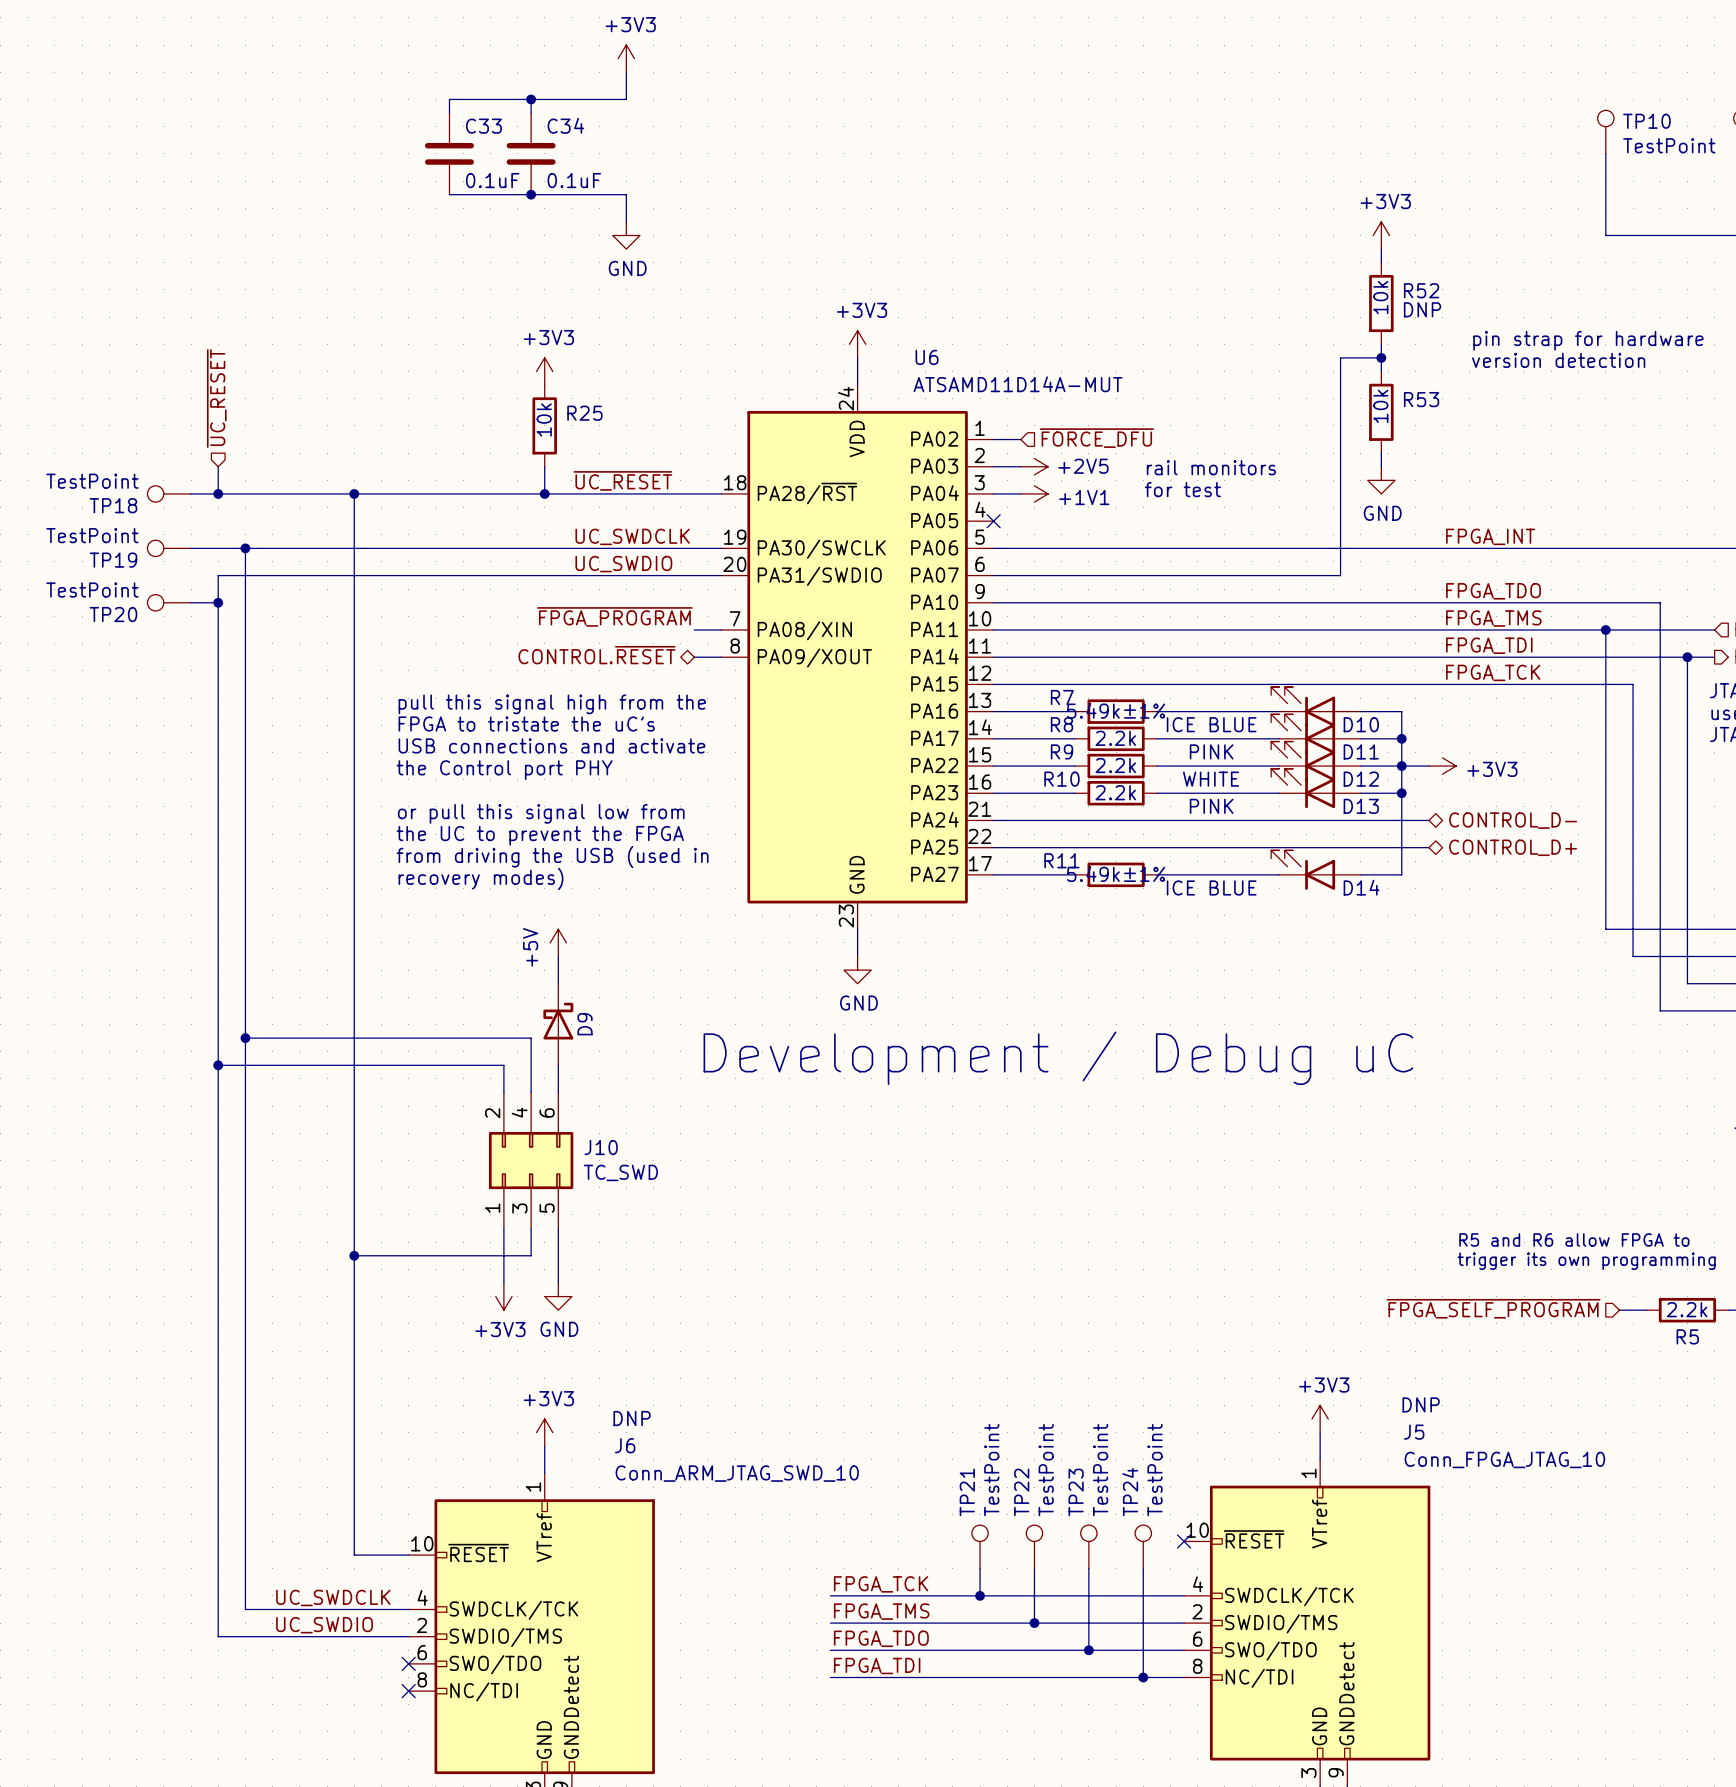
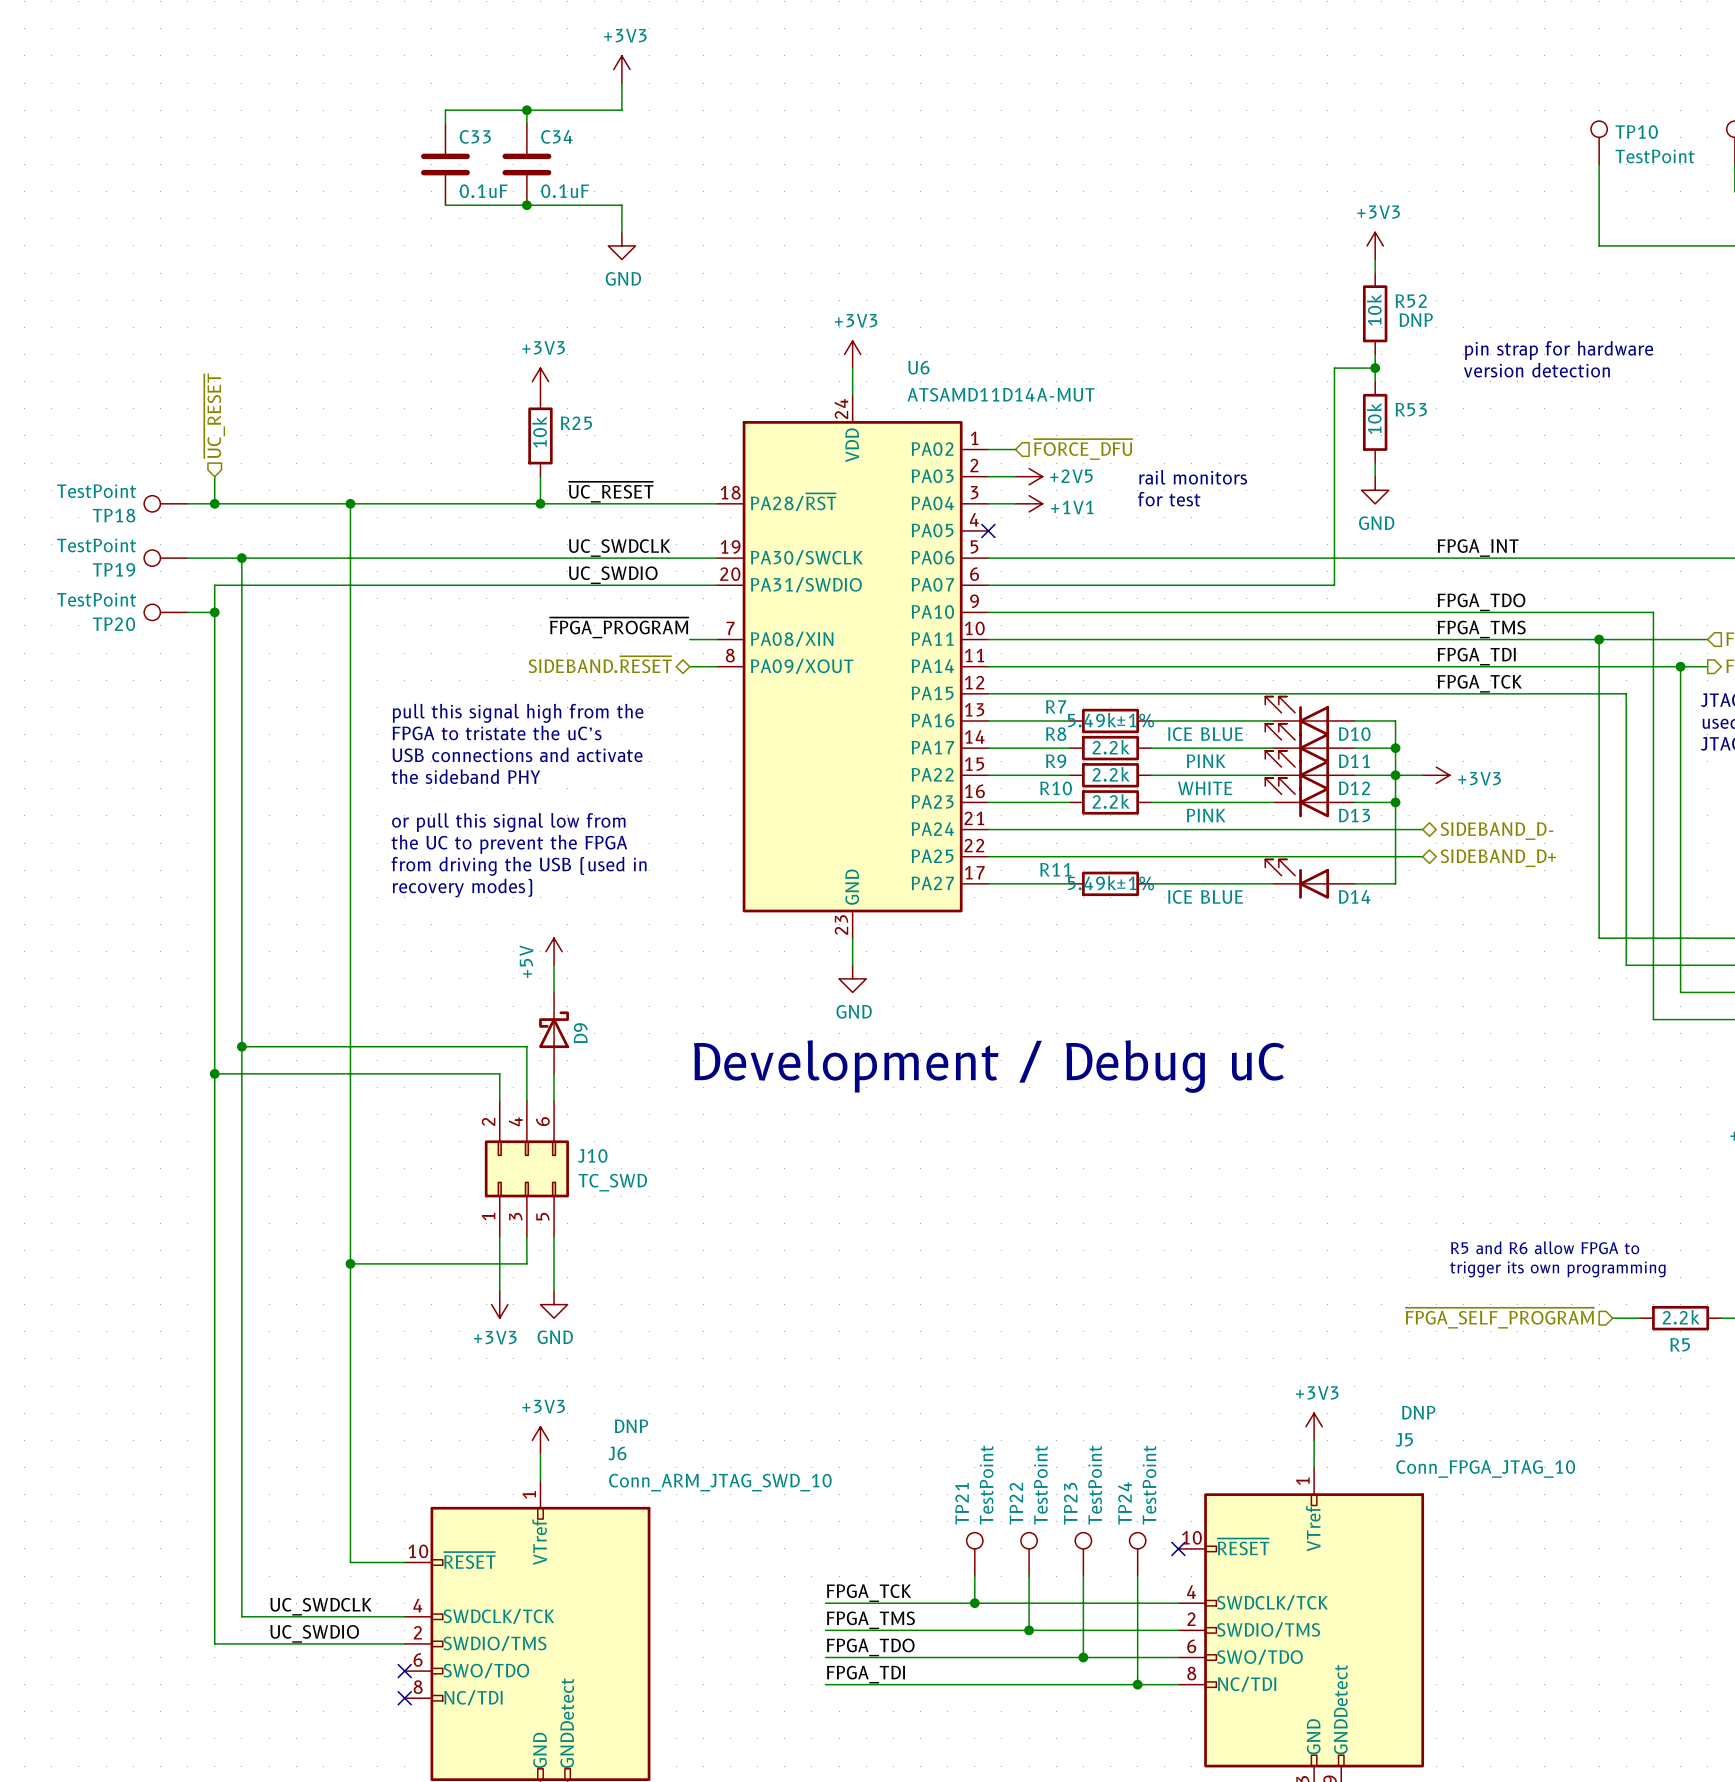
hierarchical label: CONTROL.~{RESET} (596, 655) -> SIDEBAND.~{RESET} (600, 664)
text: the Control port PHY (504, 770) -> the sideband PHY (465, 776)
hierarchical label: CONTROL_D- (1513, 820) -> SIDEBAND_D- (1497, 831)
hierarchical label: CONTROL_D+ (1513, 847) -> SIDEBAND_D+ (1498, 858)

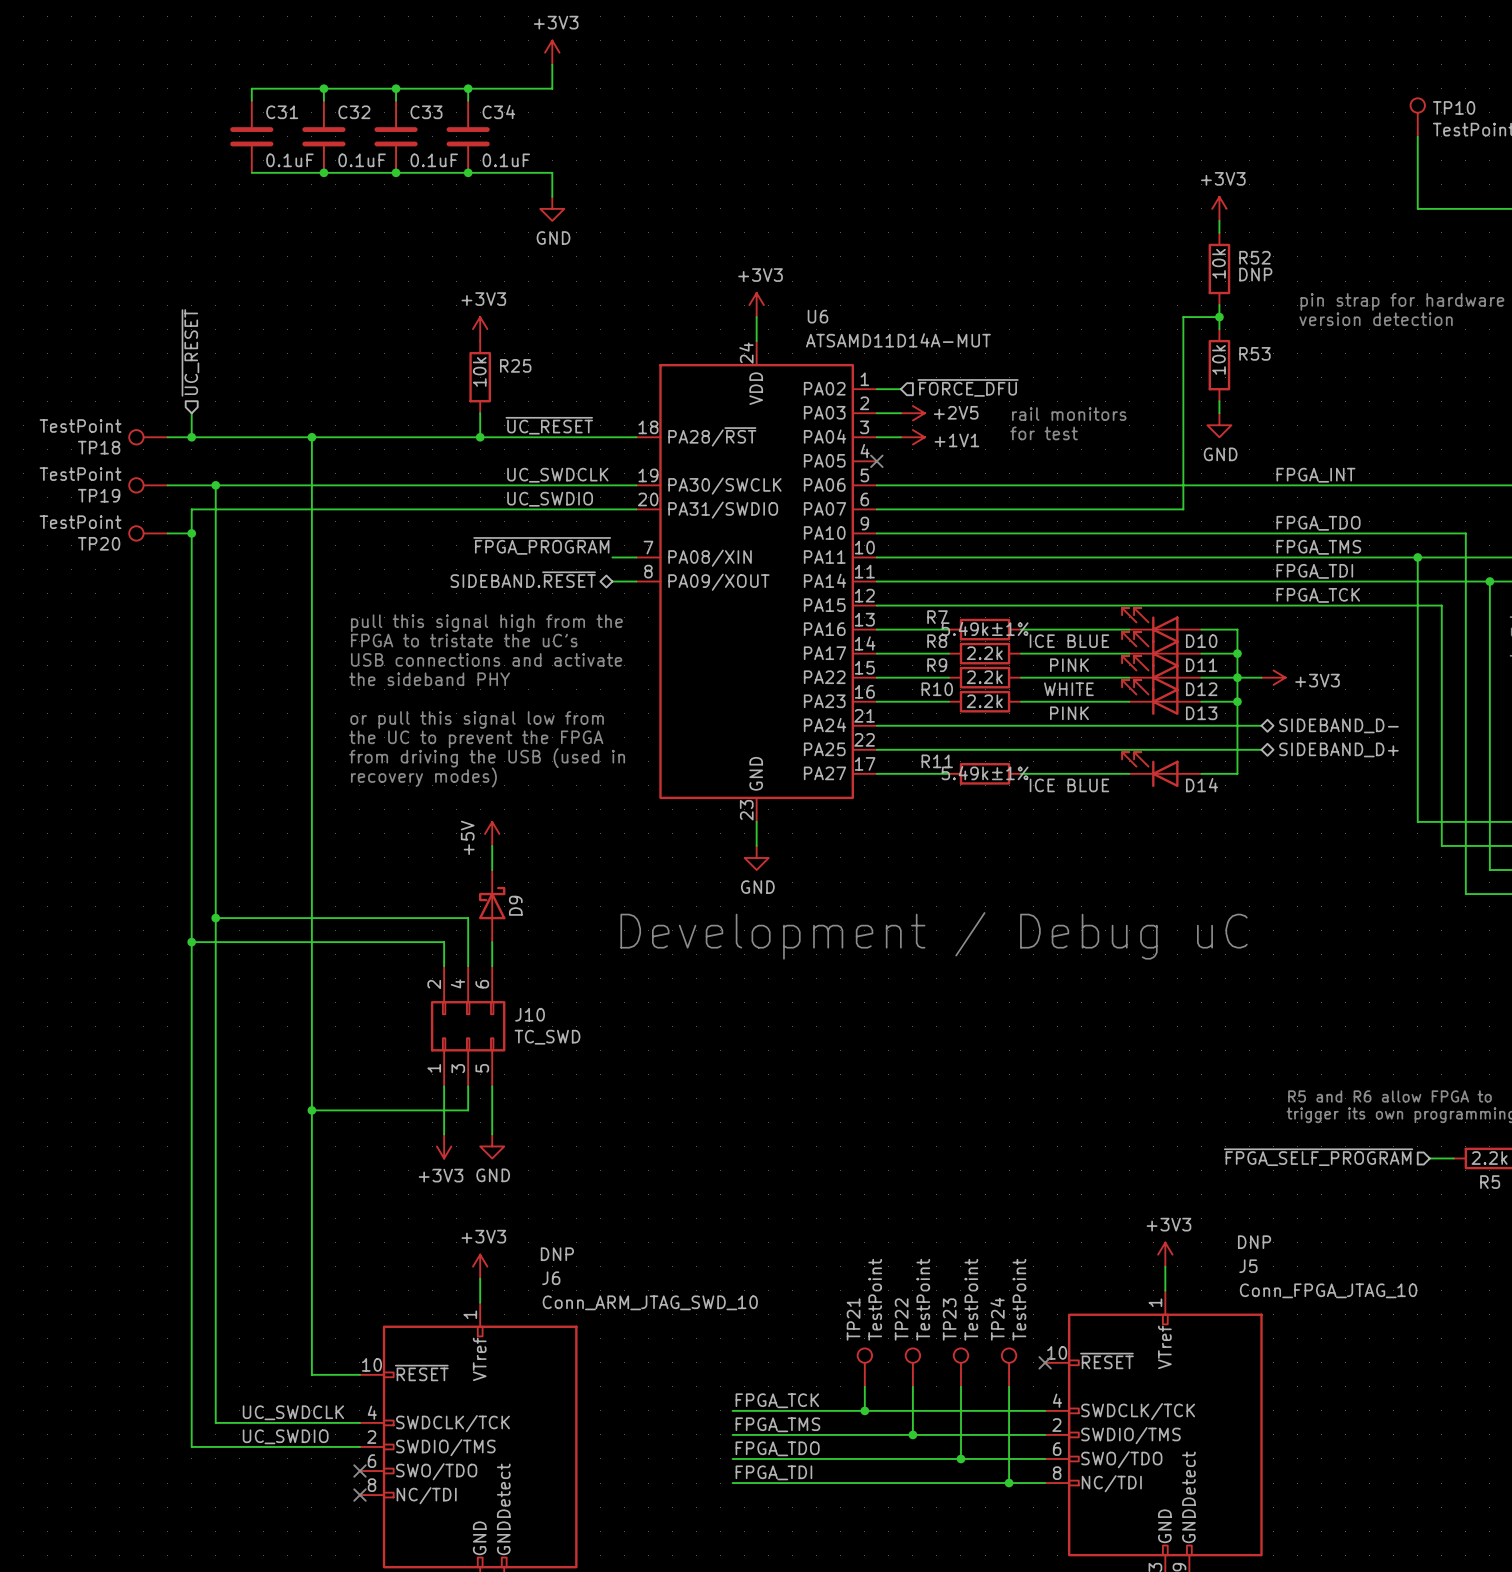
wire: none -> (323, 88) (323, 100)
junction: none -> (323, 88)
wire: none -> (396, 88) (251, 88) (251, 100)
junction: none -> (396, 88)
C31: none -> 0.1uF (251, 136)
C32: none -> 0.1uF (323, 136)
wire: none -> (251, 172) (396, 172)
junction: none -> (323, 172)
junction: none -> (396, 172)

